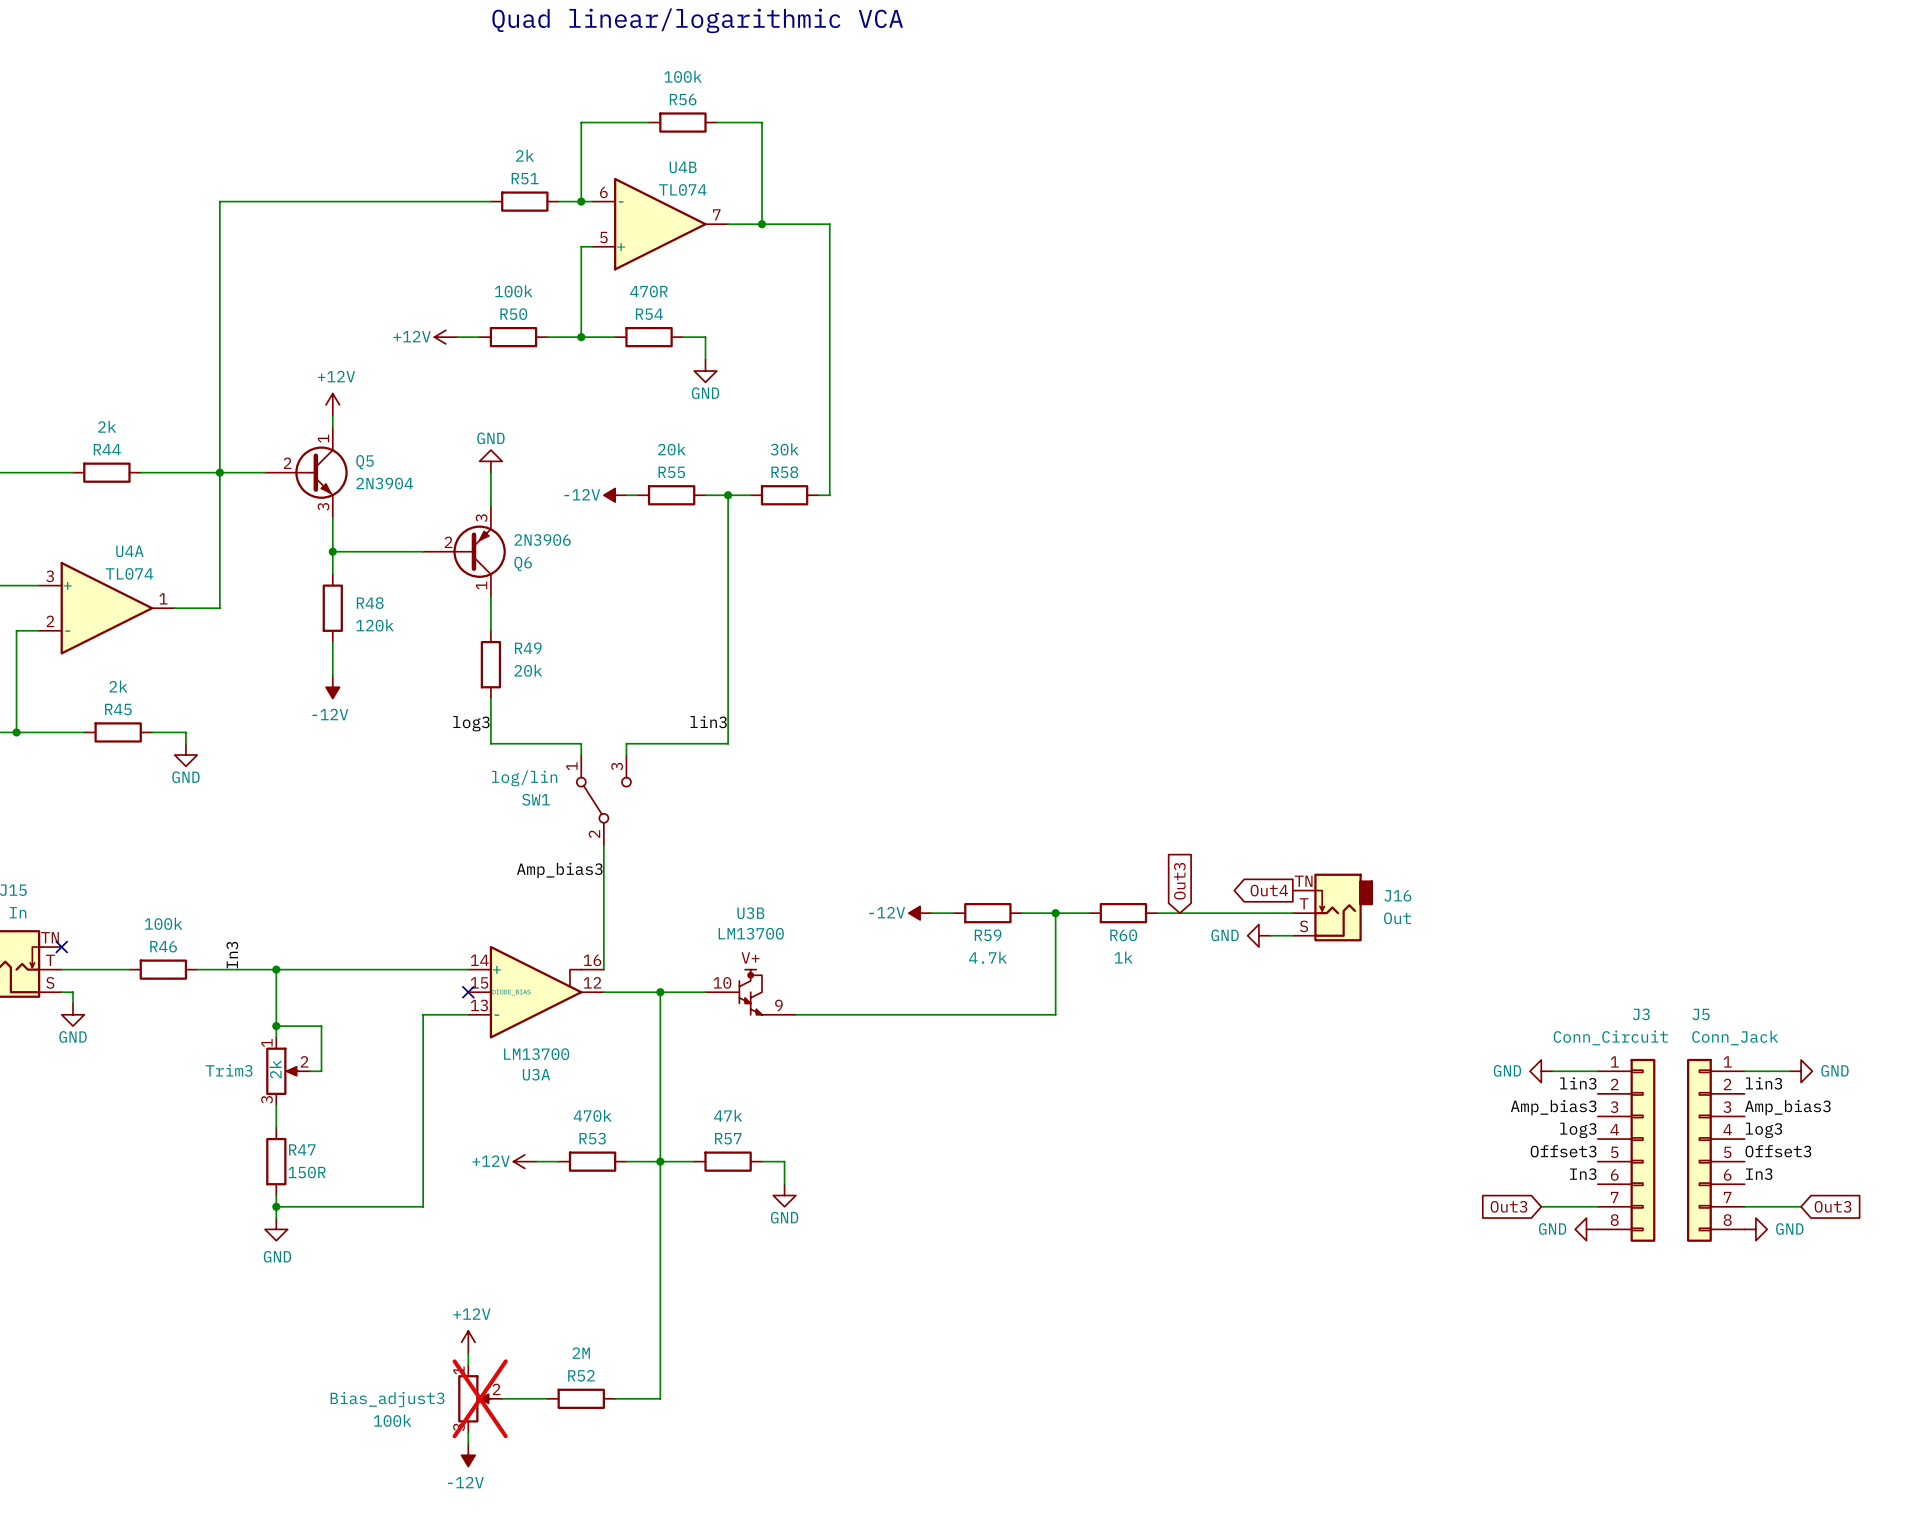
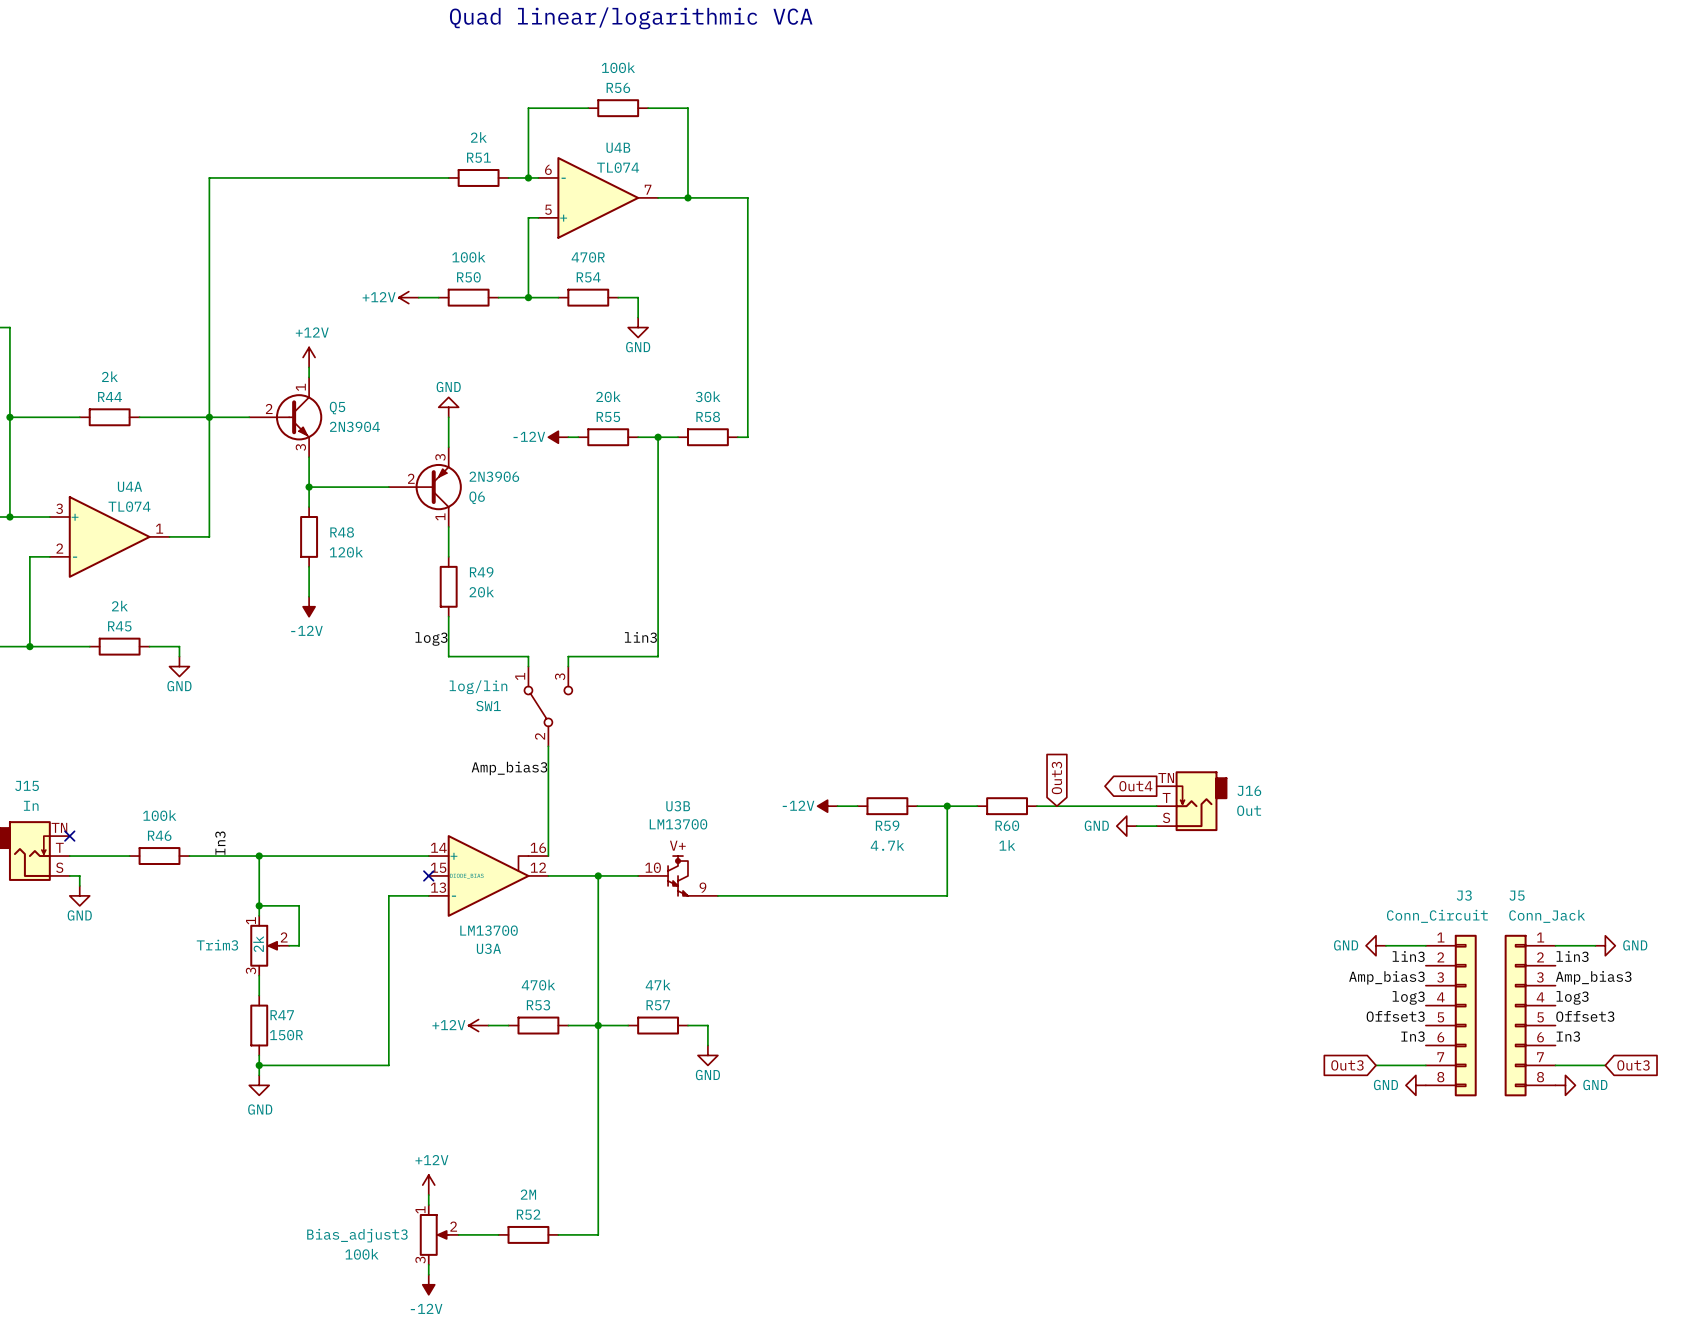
Bias_adjust3 do-not-place cross: (480, 1398) -> none

